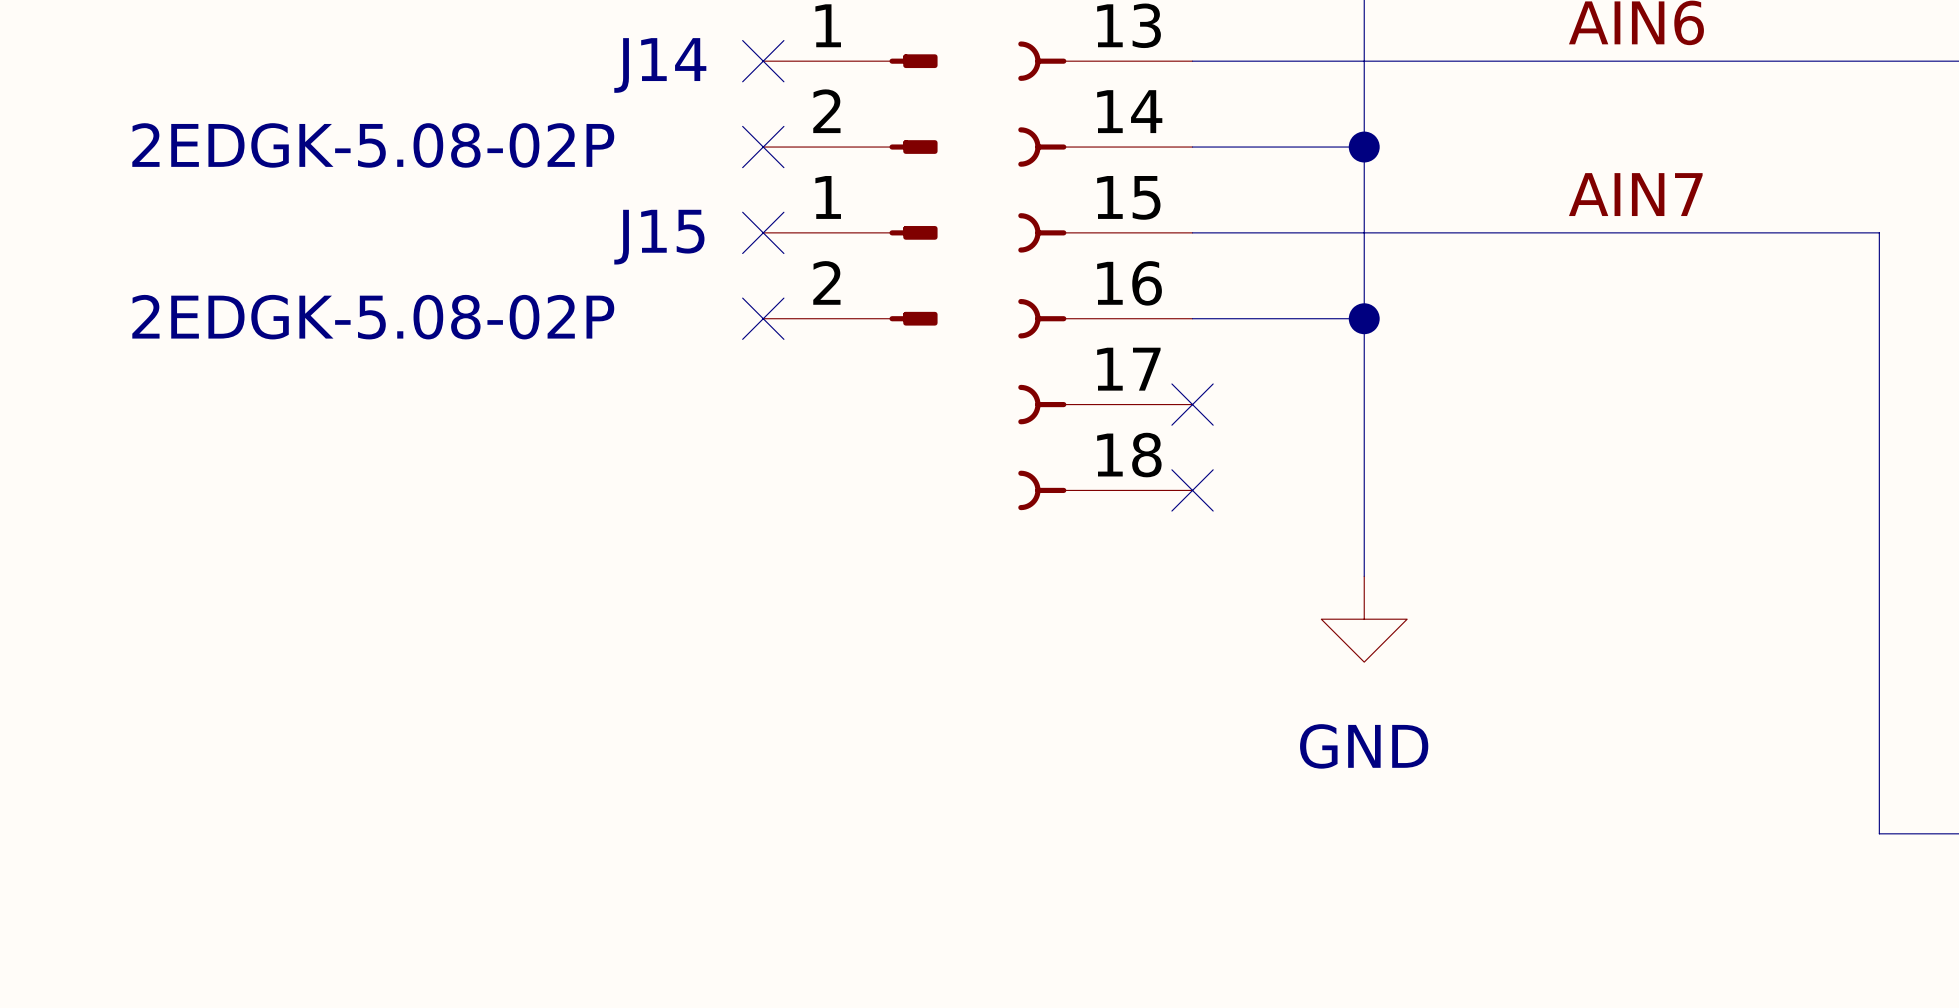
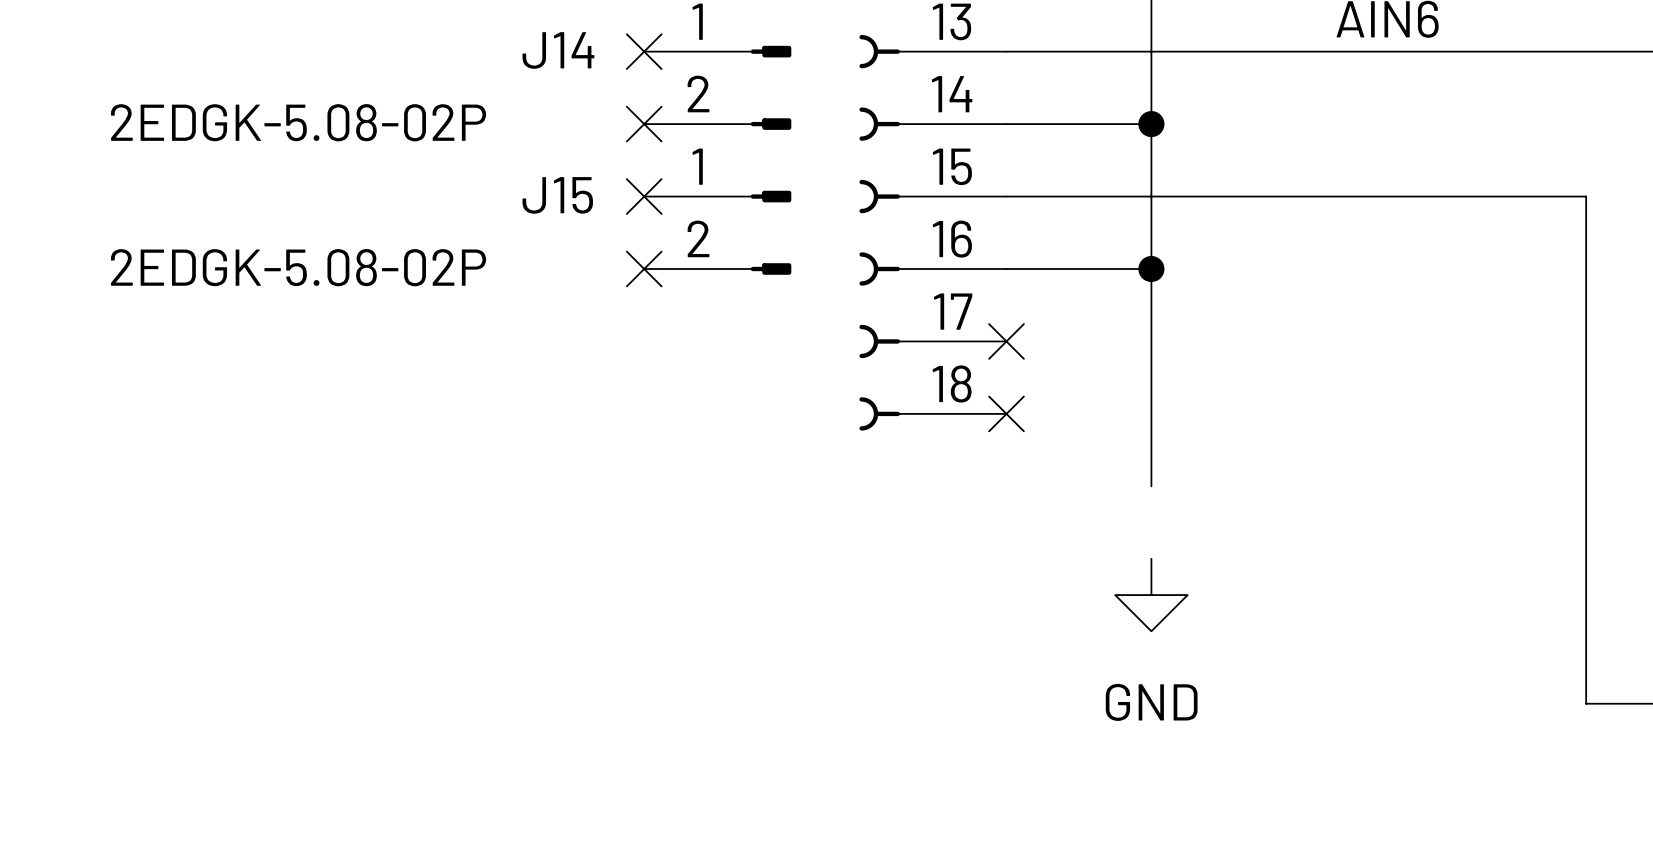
label: AIN7 (1635, 194) -> none
power symbol position: GND (1364, 619) -> GND (1151, 595)

